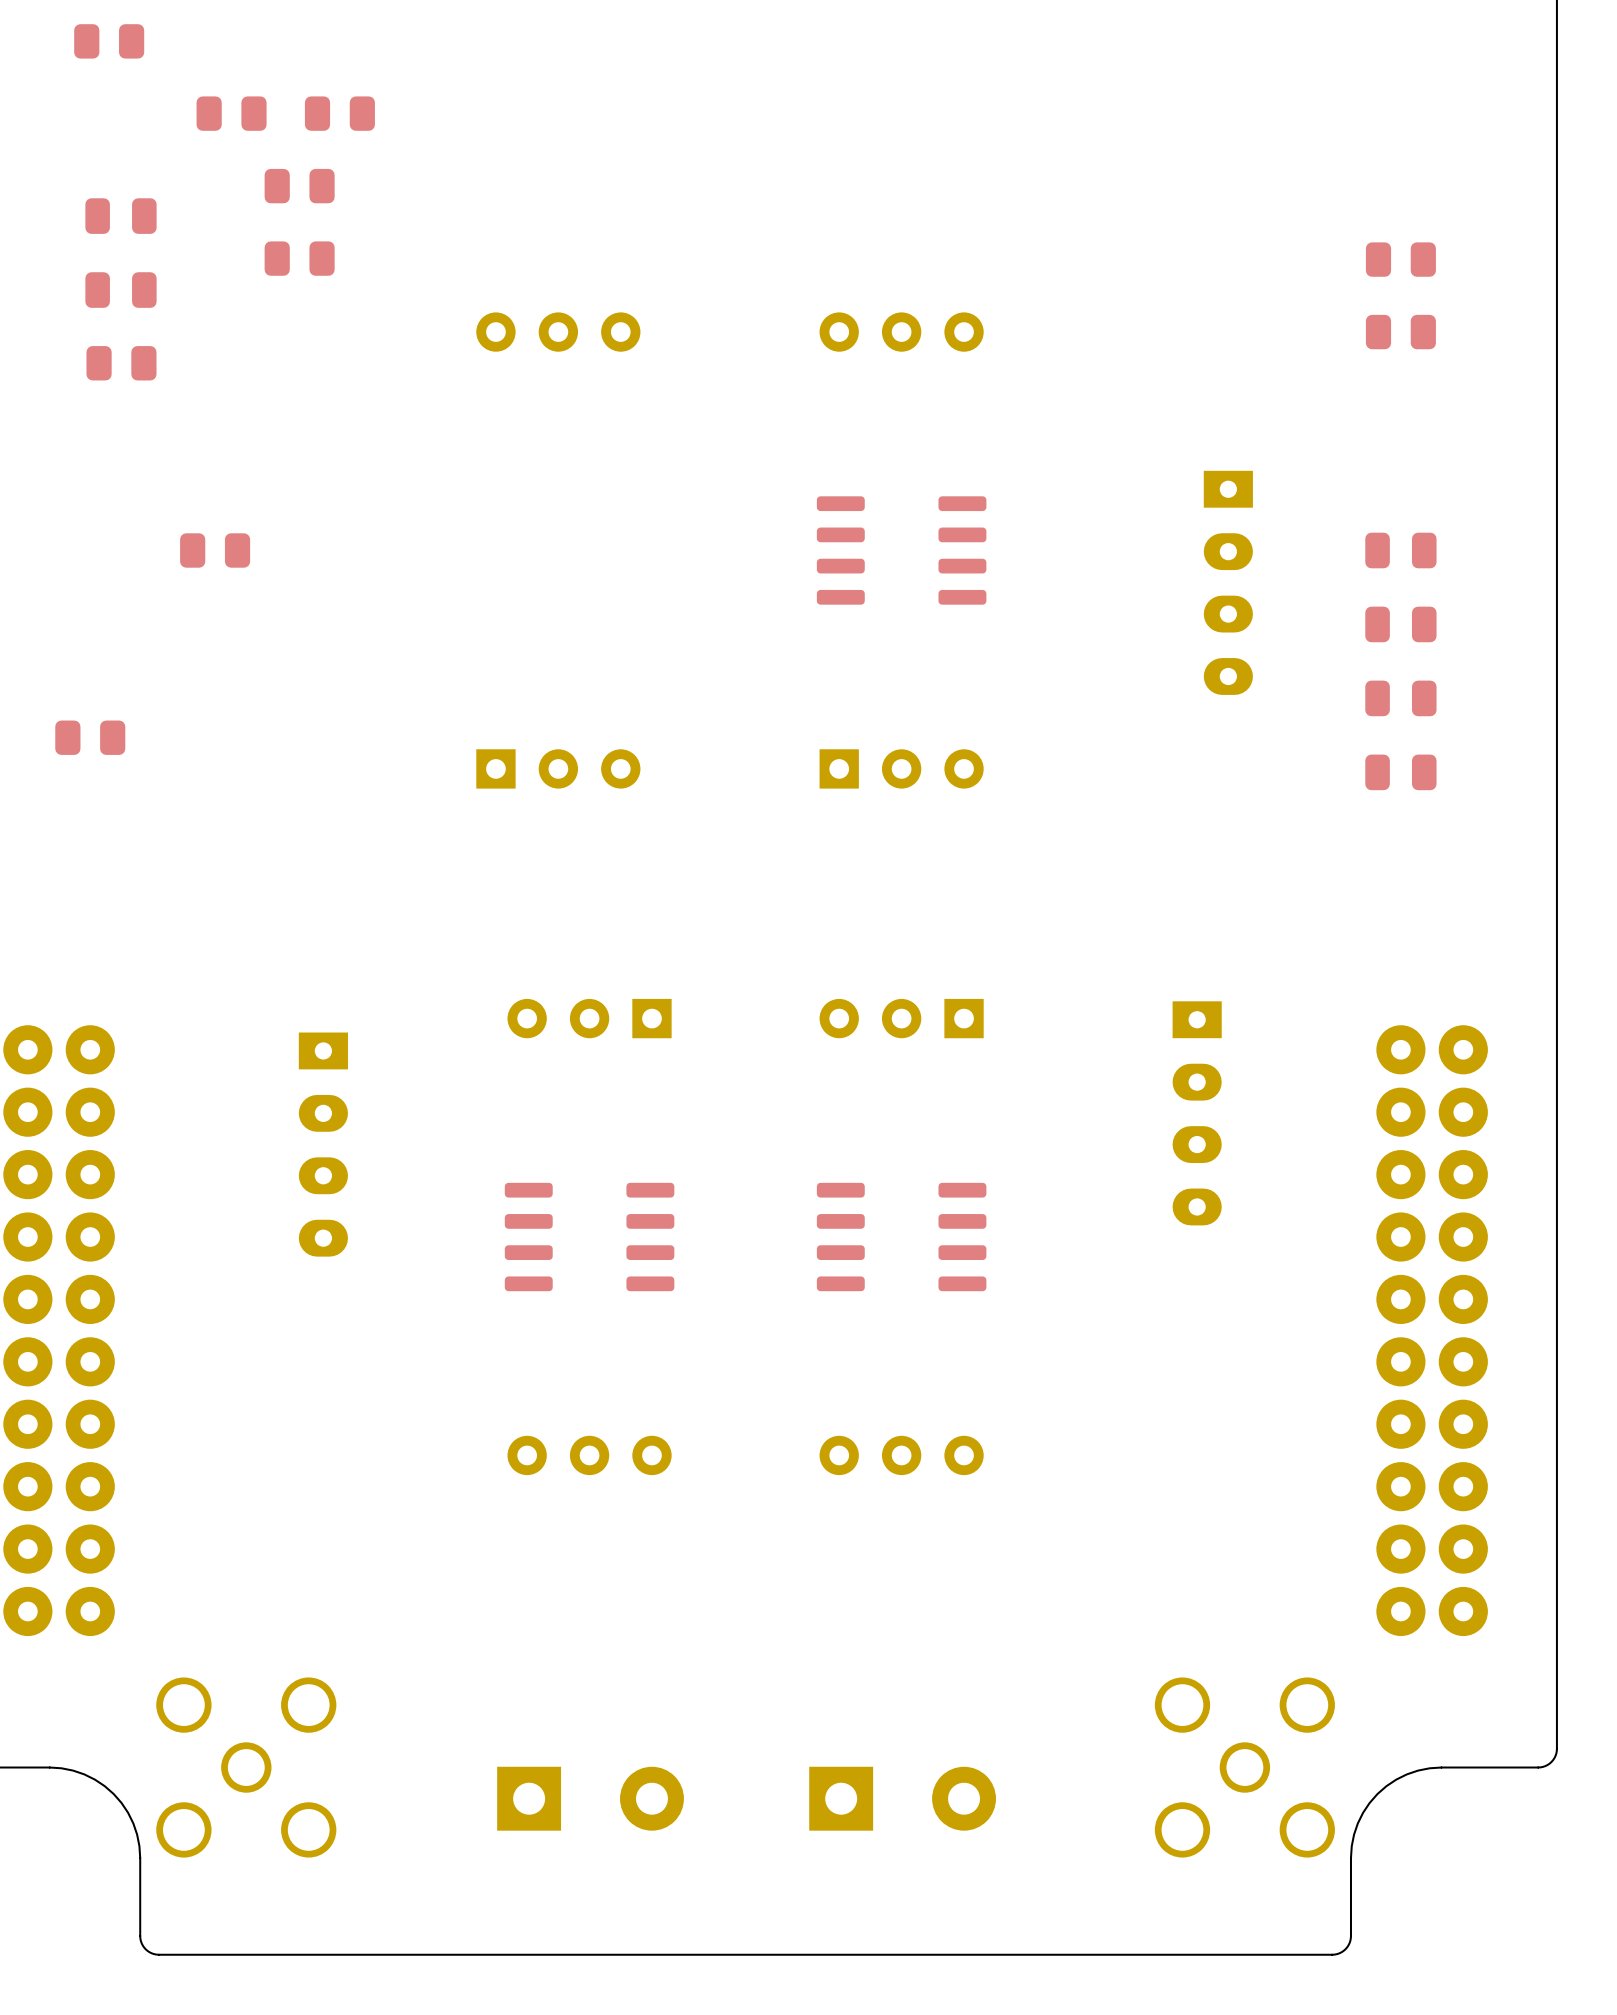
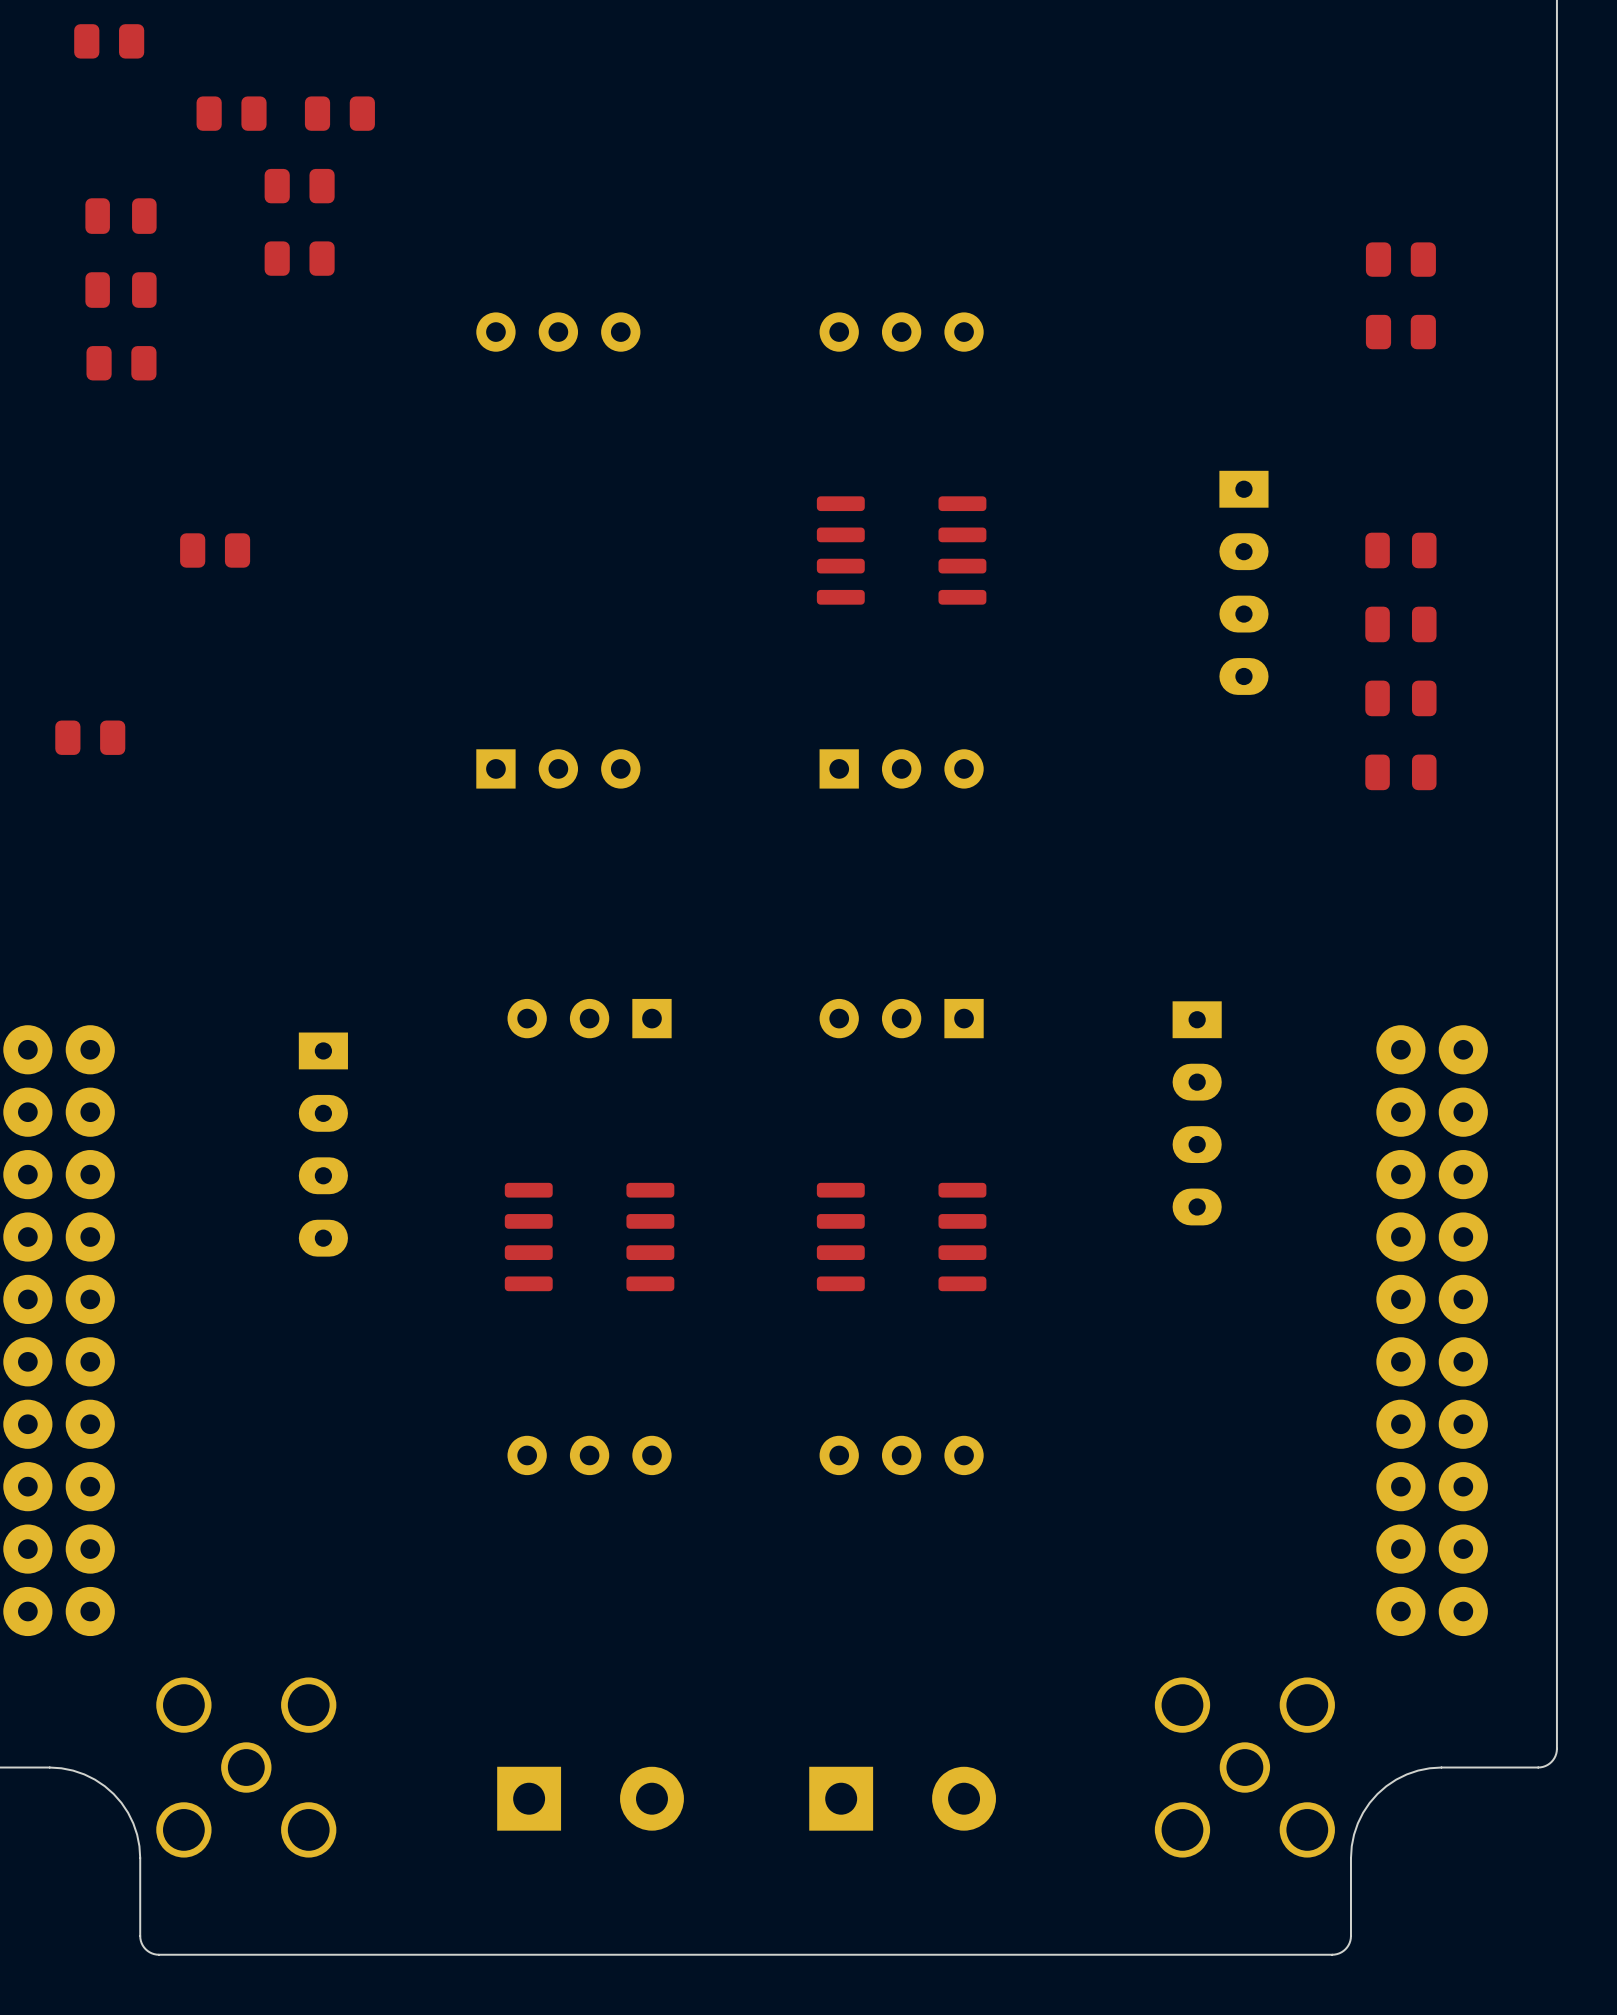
part position: (1228, 582) -> (1243, 582)

